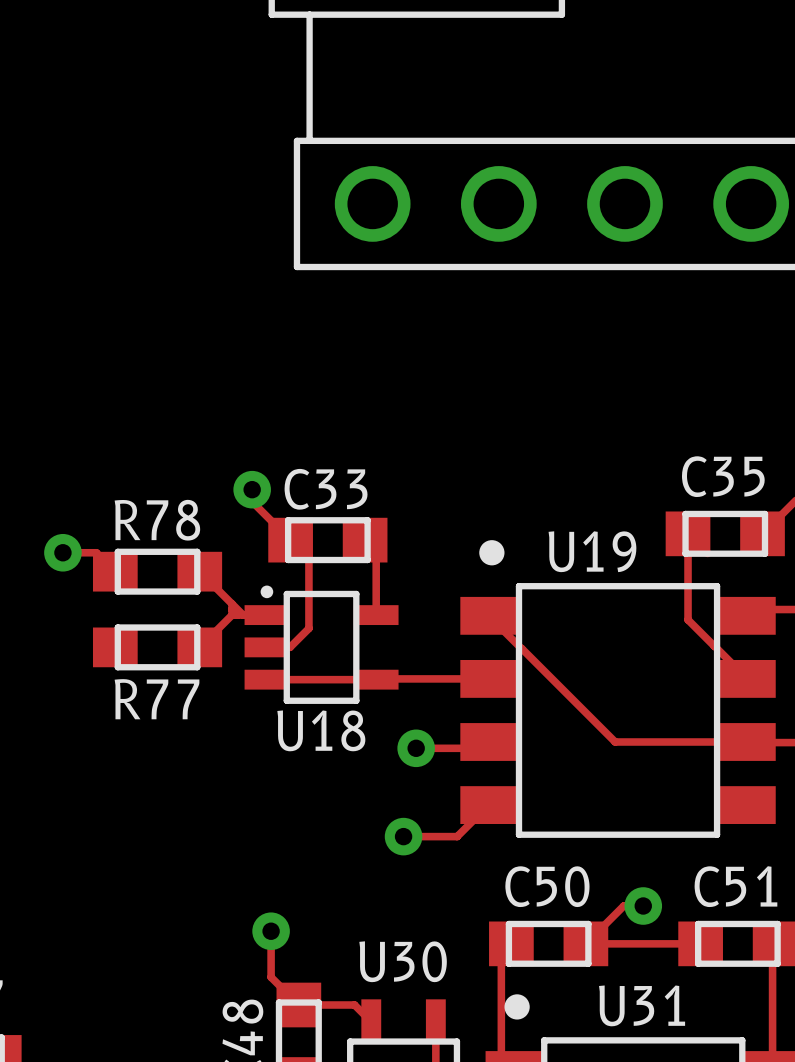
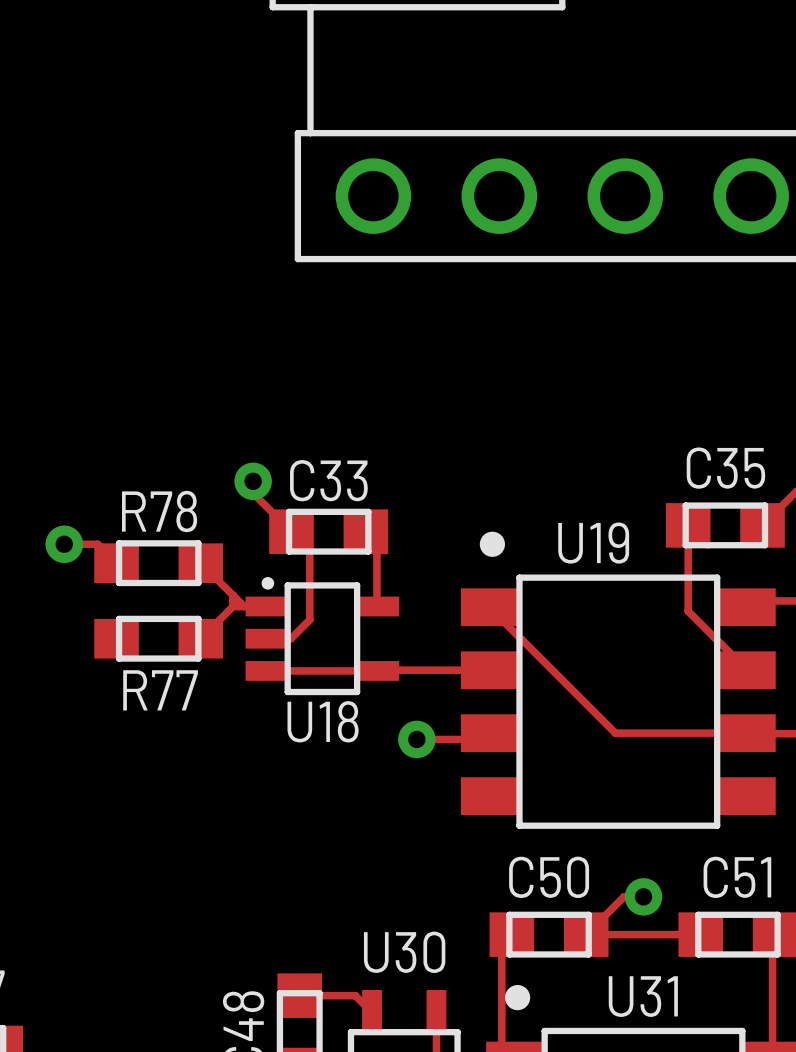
top track: (488, 805) (457, 836) (403, 836) -> none
via: (403, 836) -> none
top track: (271, 931) (271, 977) (298, 1005) -> none
via: (271, 931) -> none

